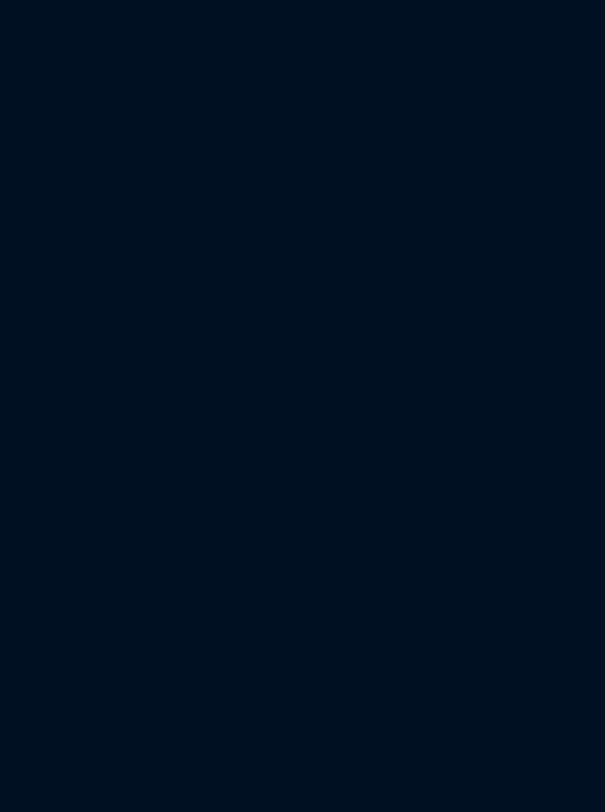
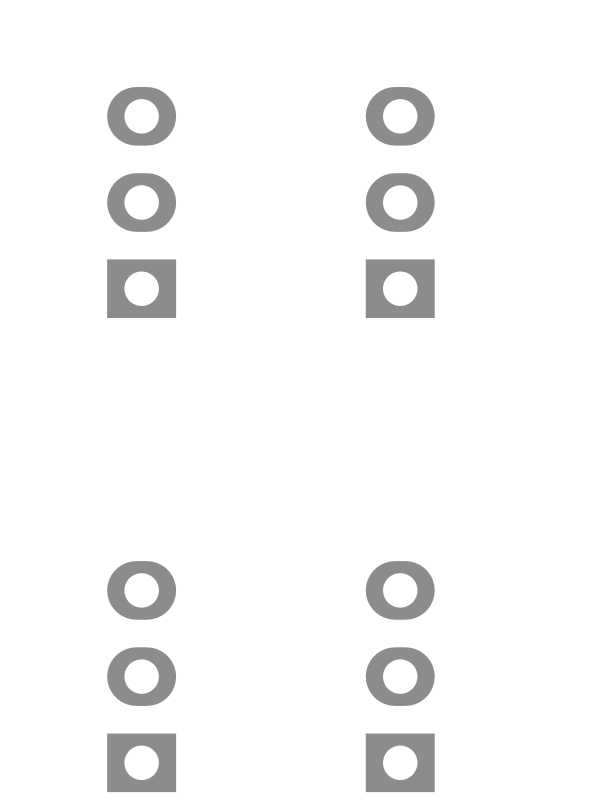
part: none -> (141, 202)
part: none -> (400, 202)
part: none -> (141, 676)
part: none -> (400, 676)

